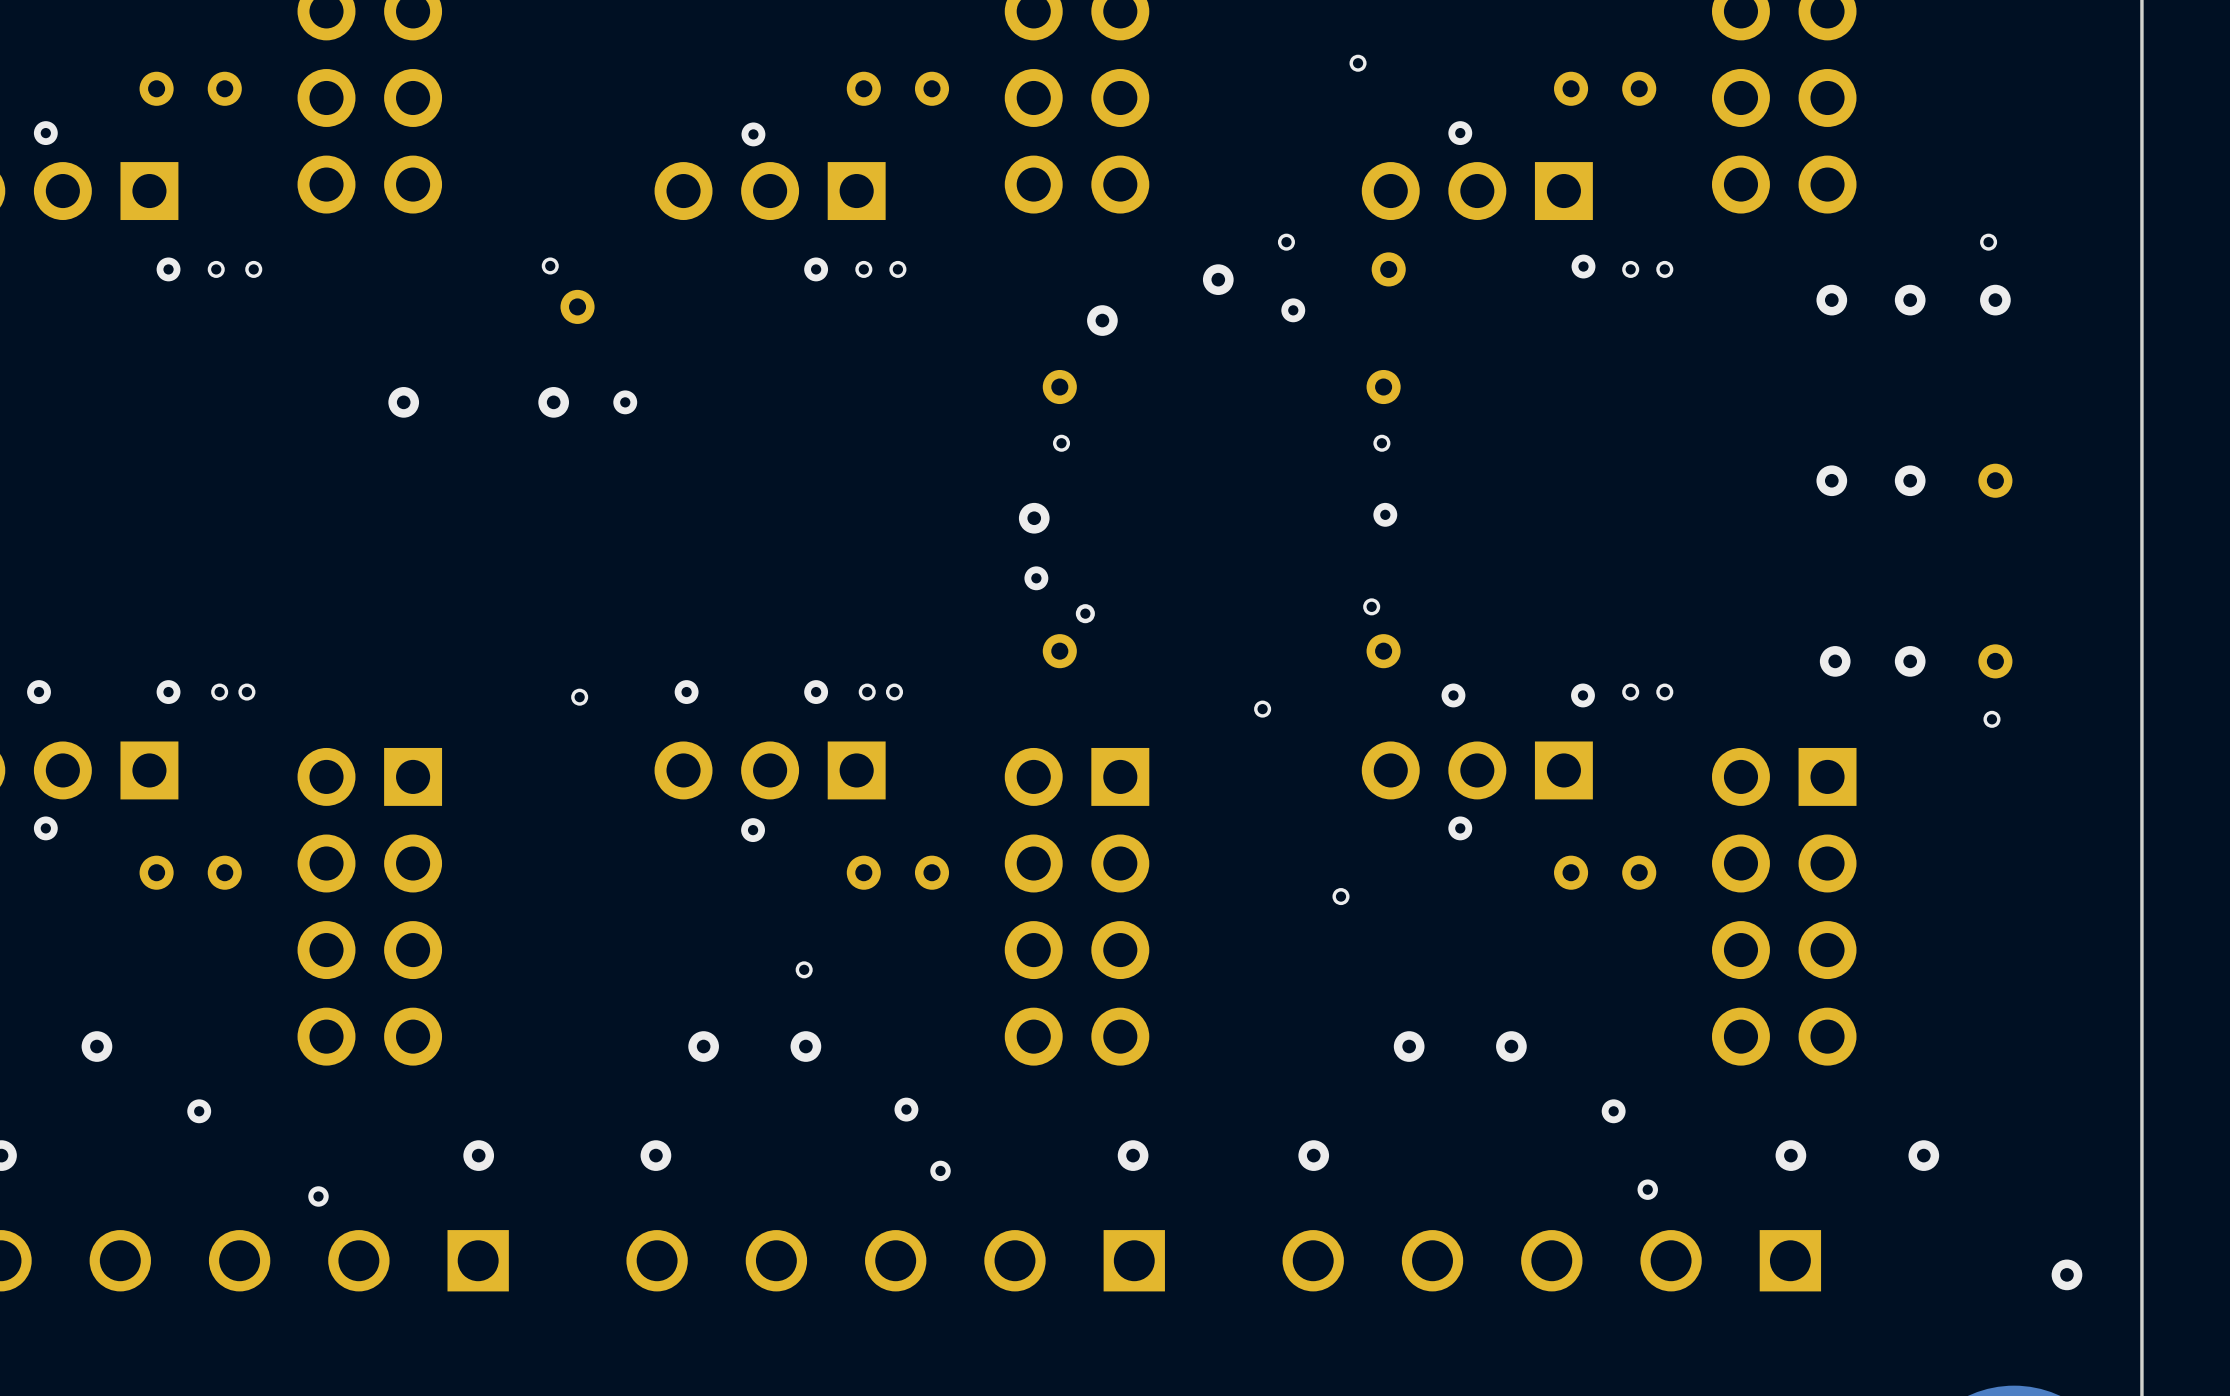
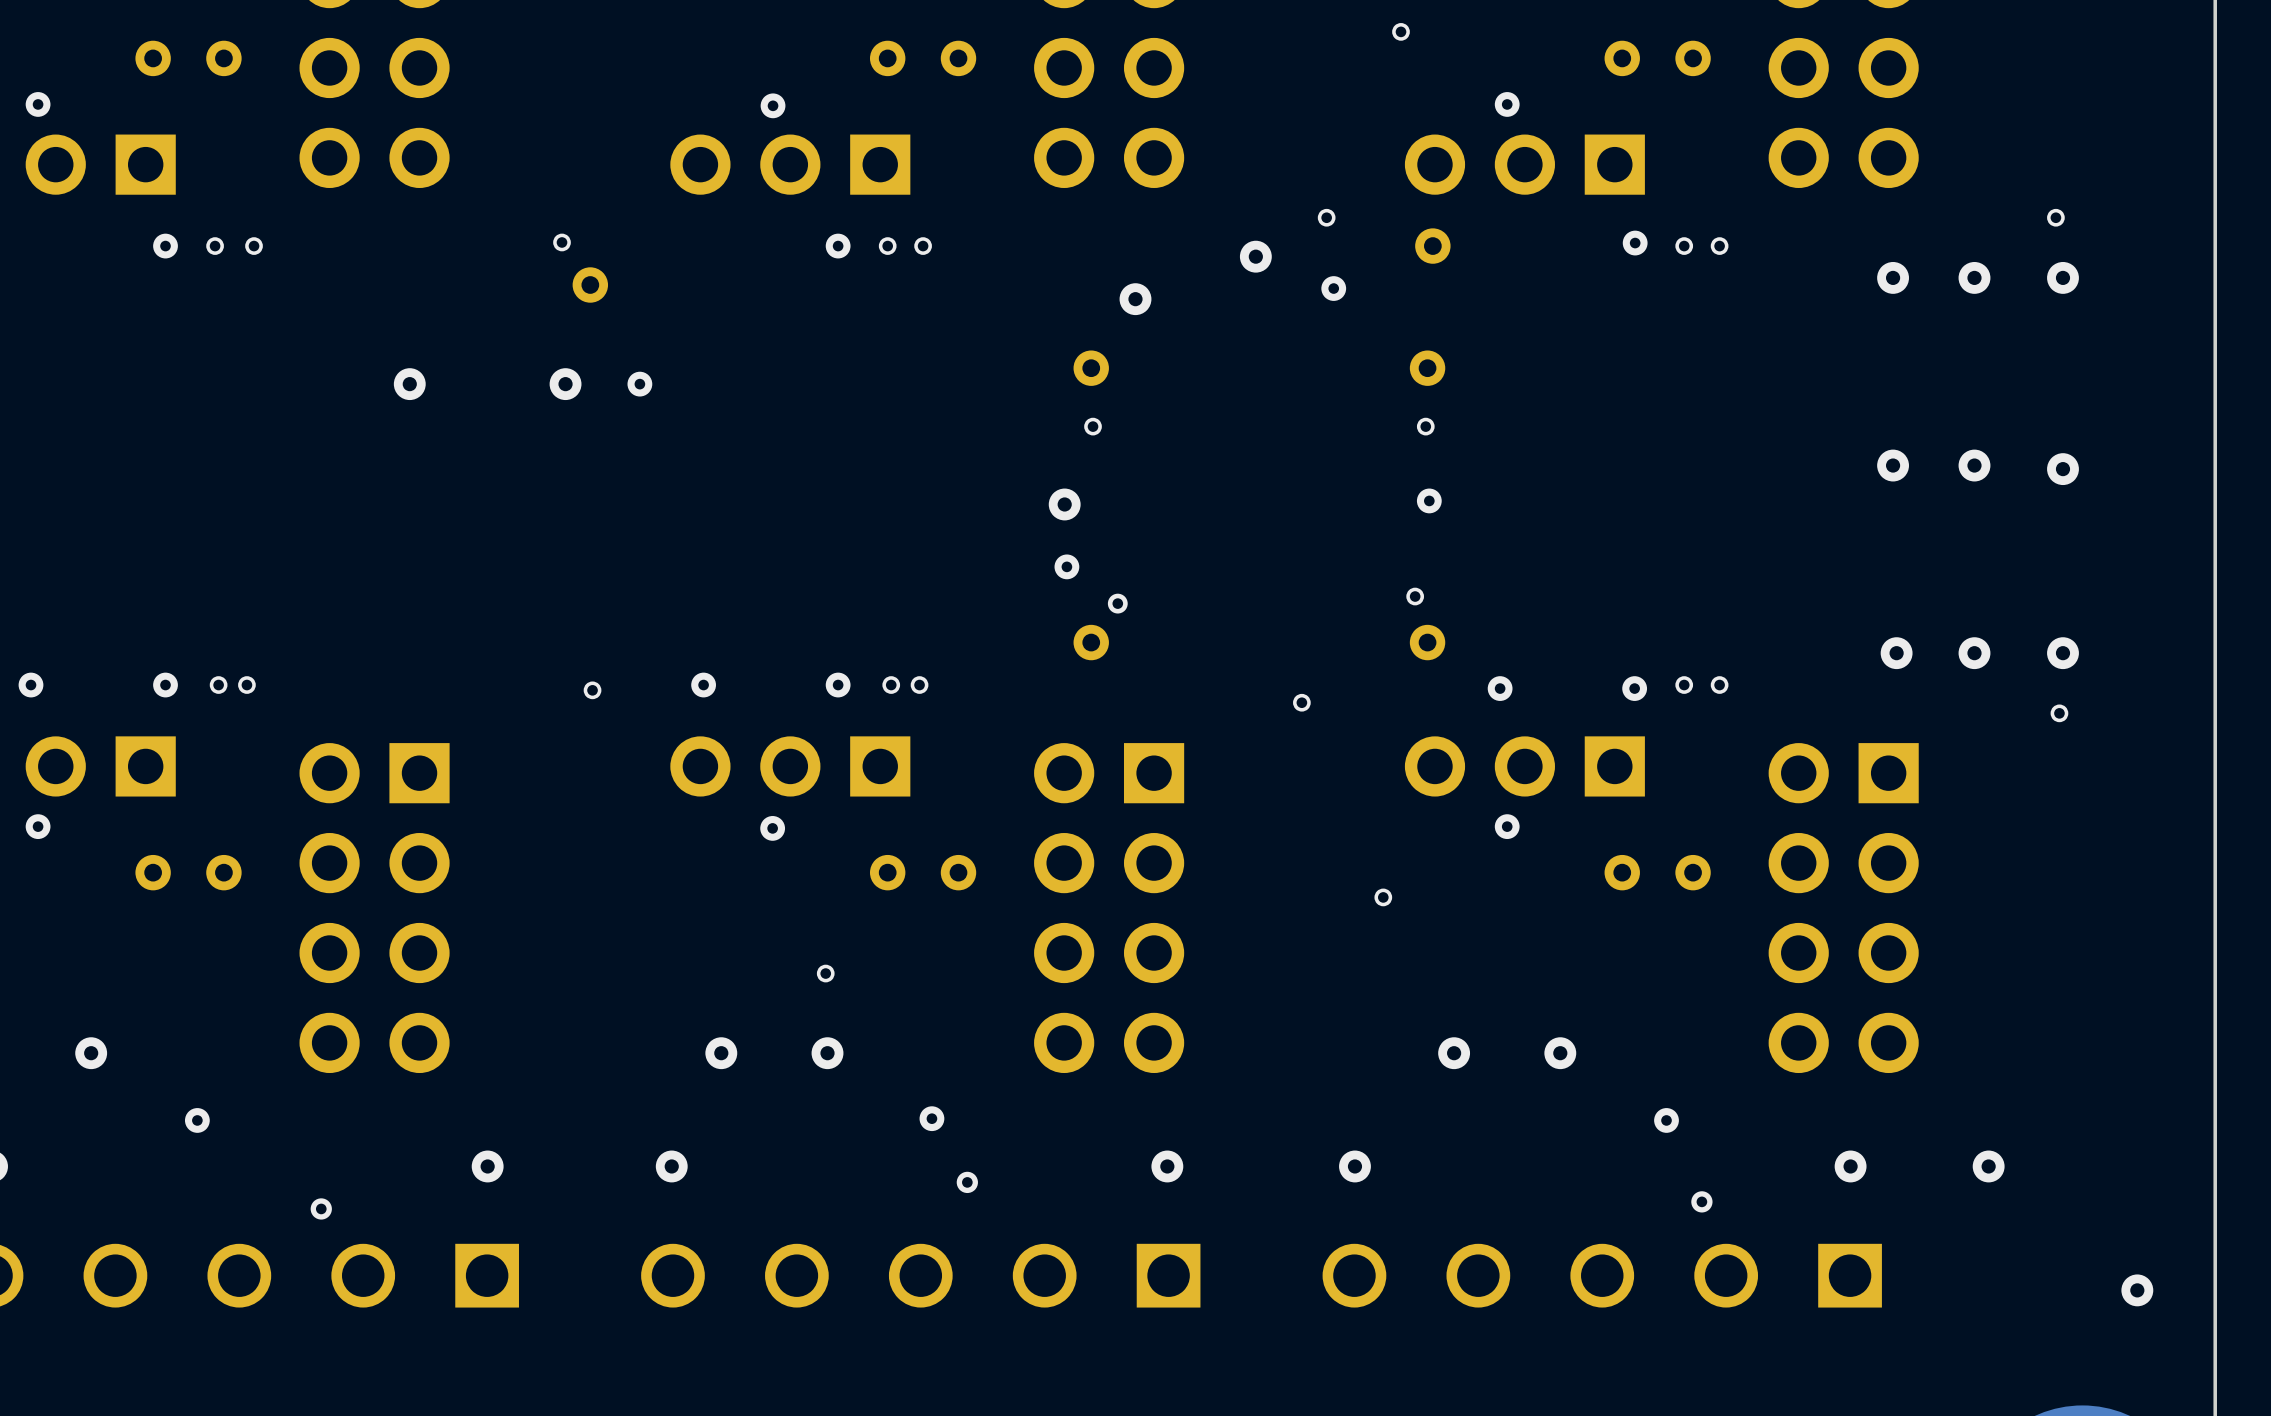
part: (1995, 480) -> none
via: none -> (2062, 469)
part: (1995, 661) -> none
via: none -> (2062, 653)

